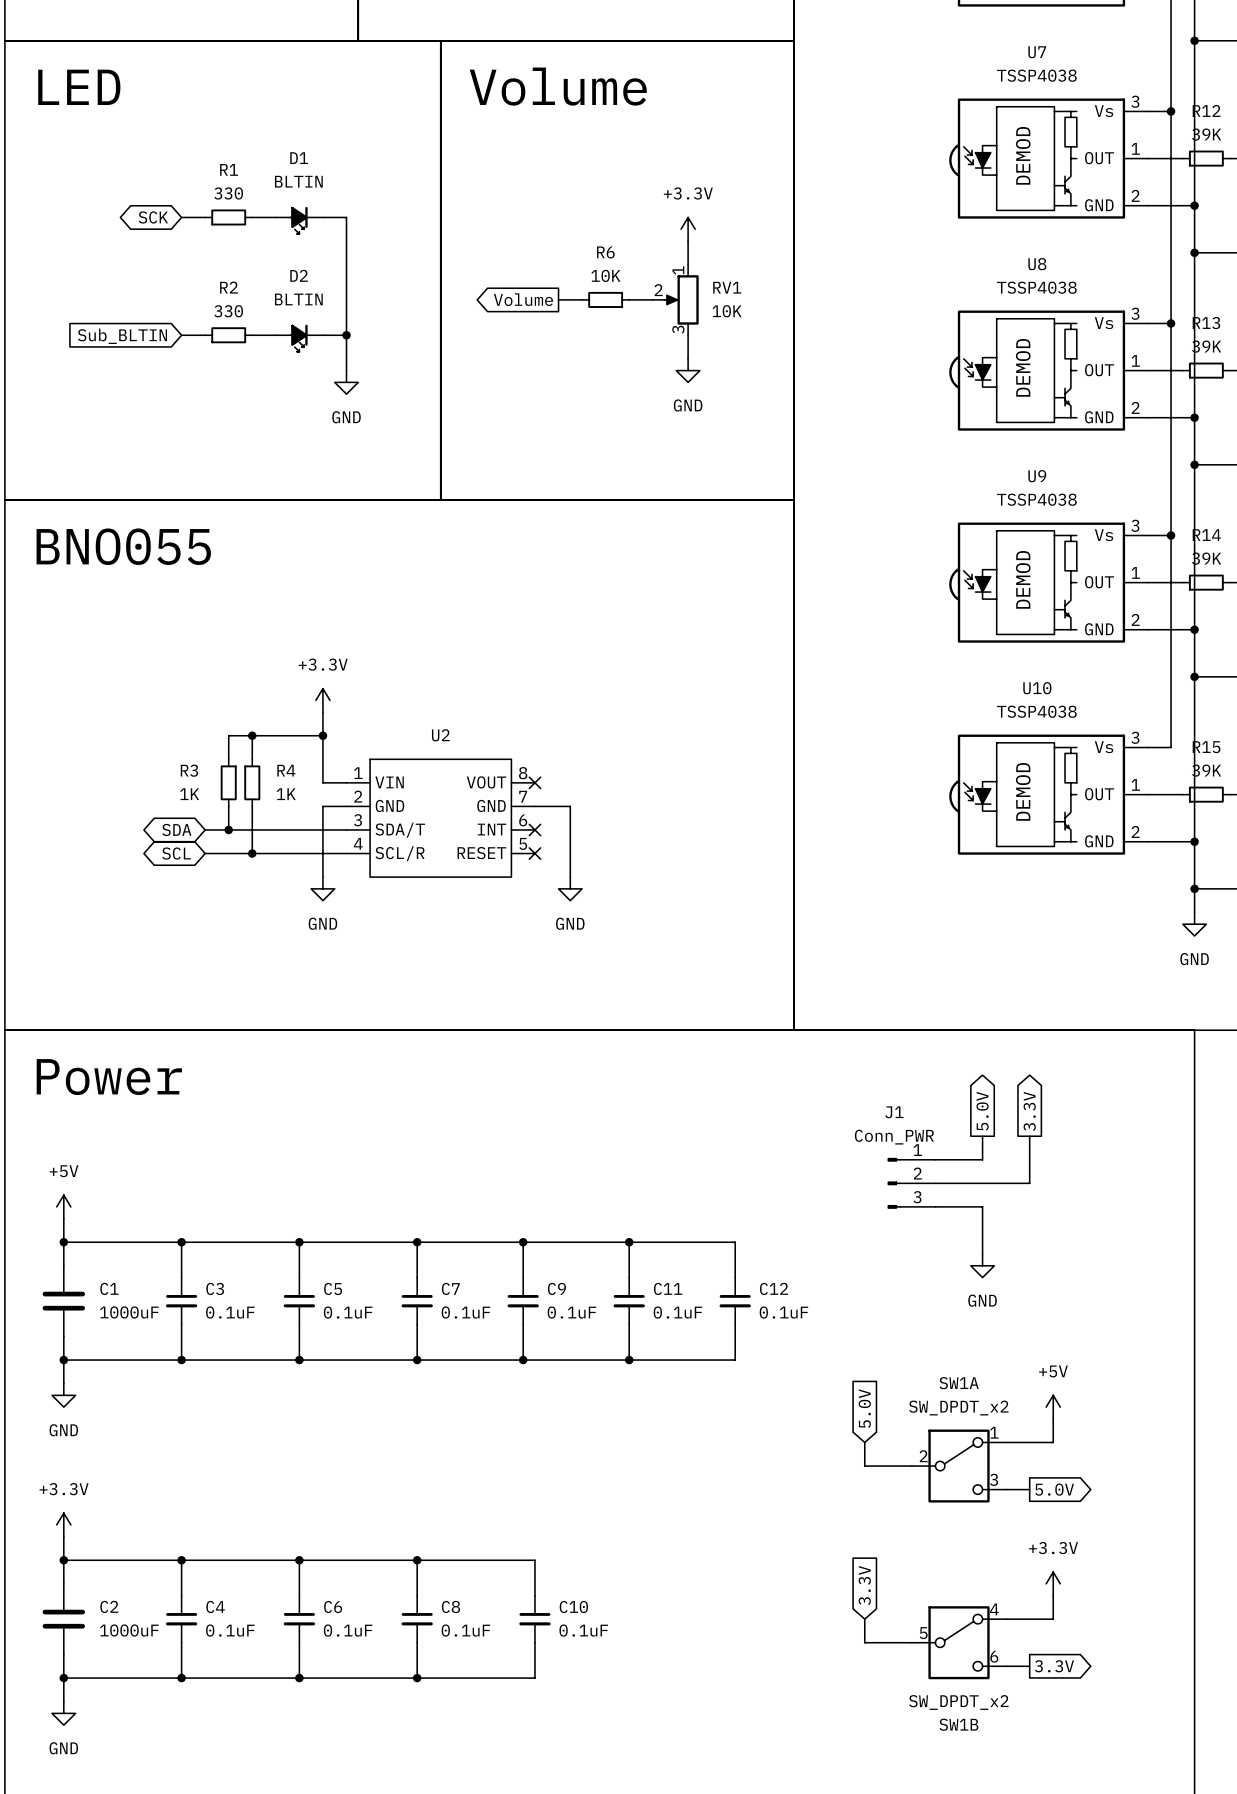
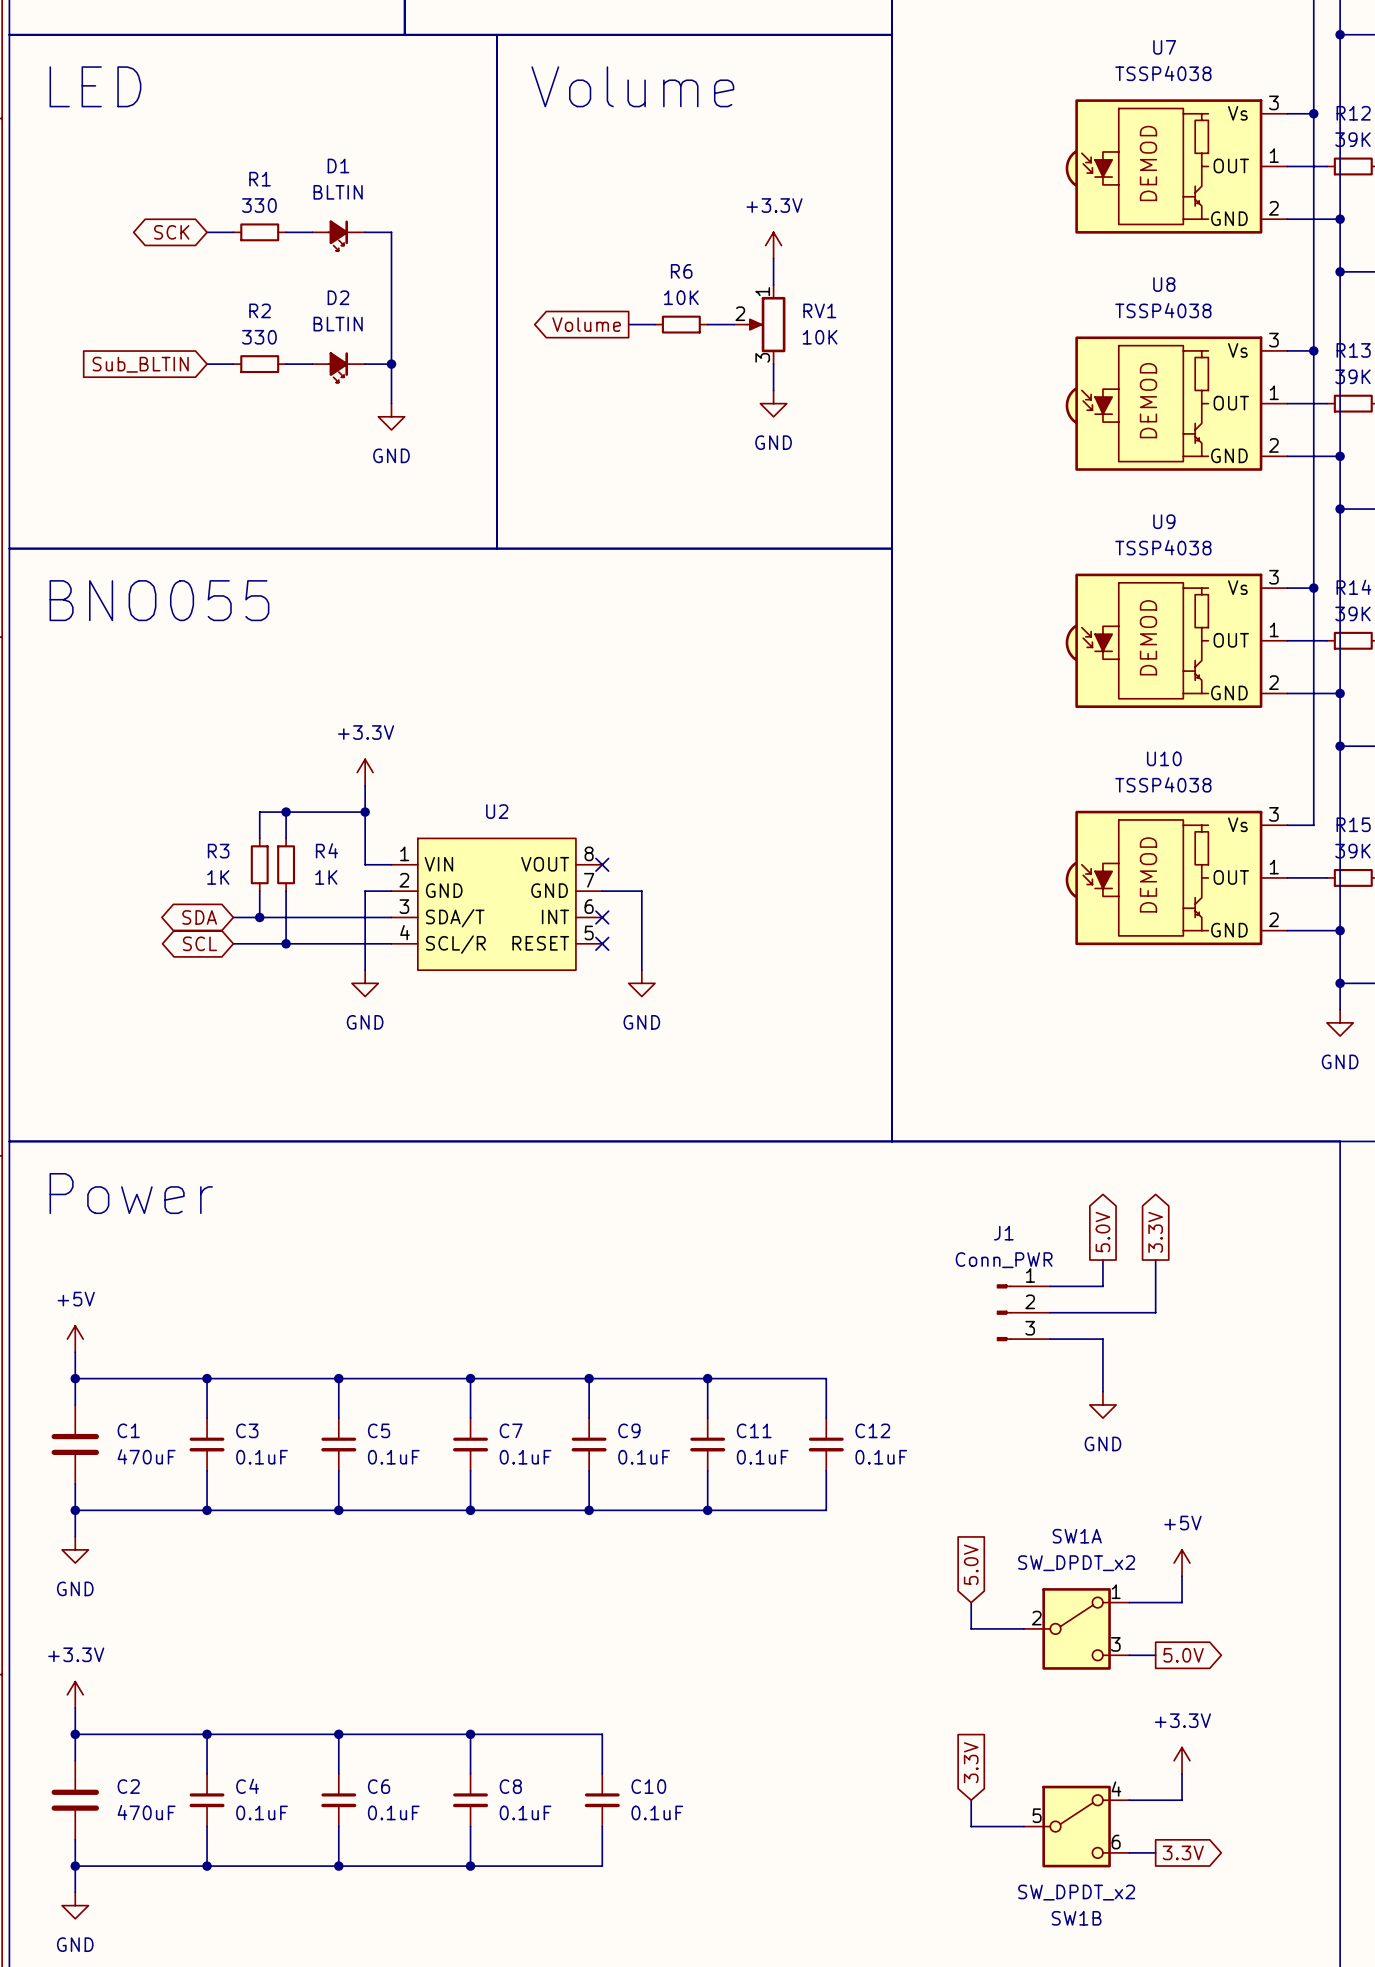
C1 value: 1000uF (129, 1312) -> 470uF (146, 1456)
C2 value: 1000uF (129, 1630) -> 470uF (146, 1812)

